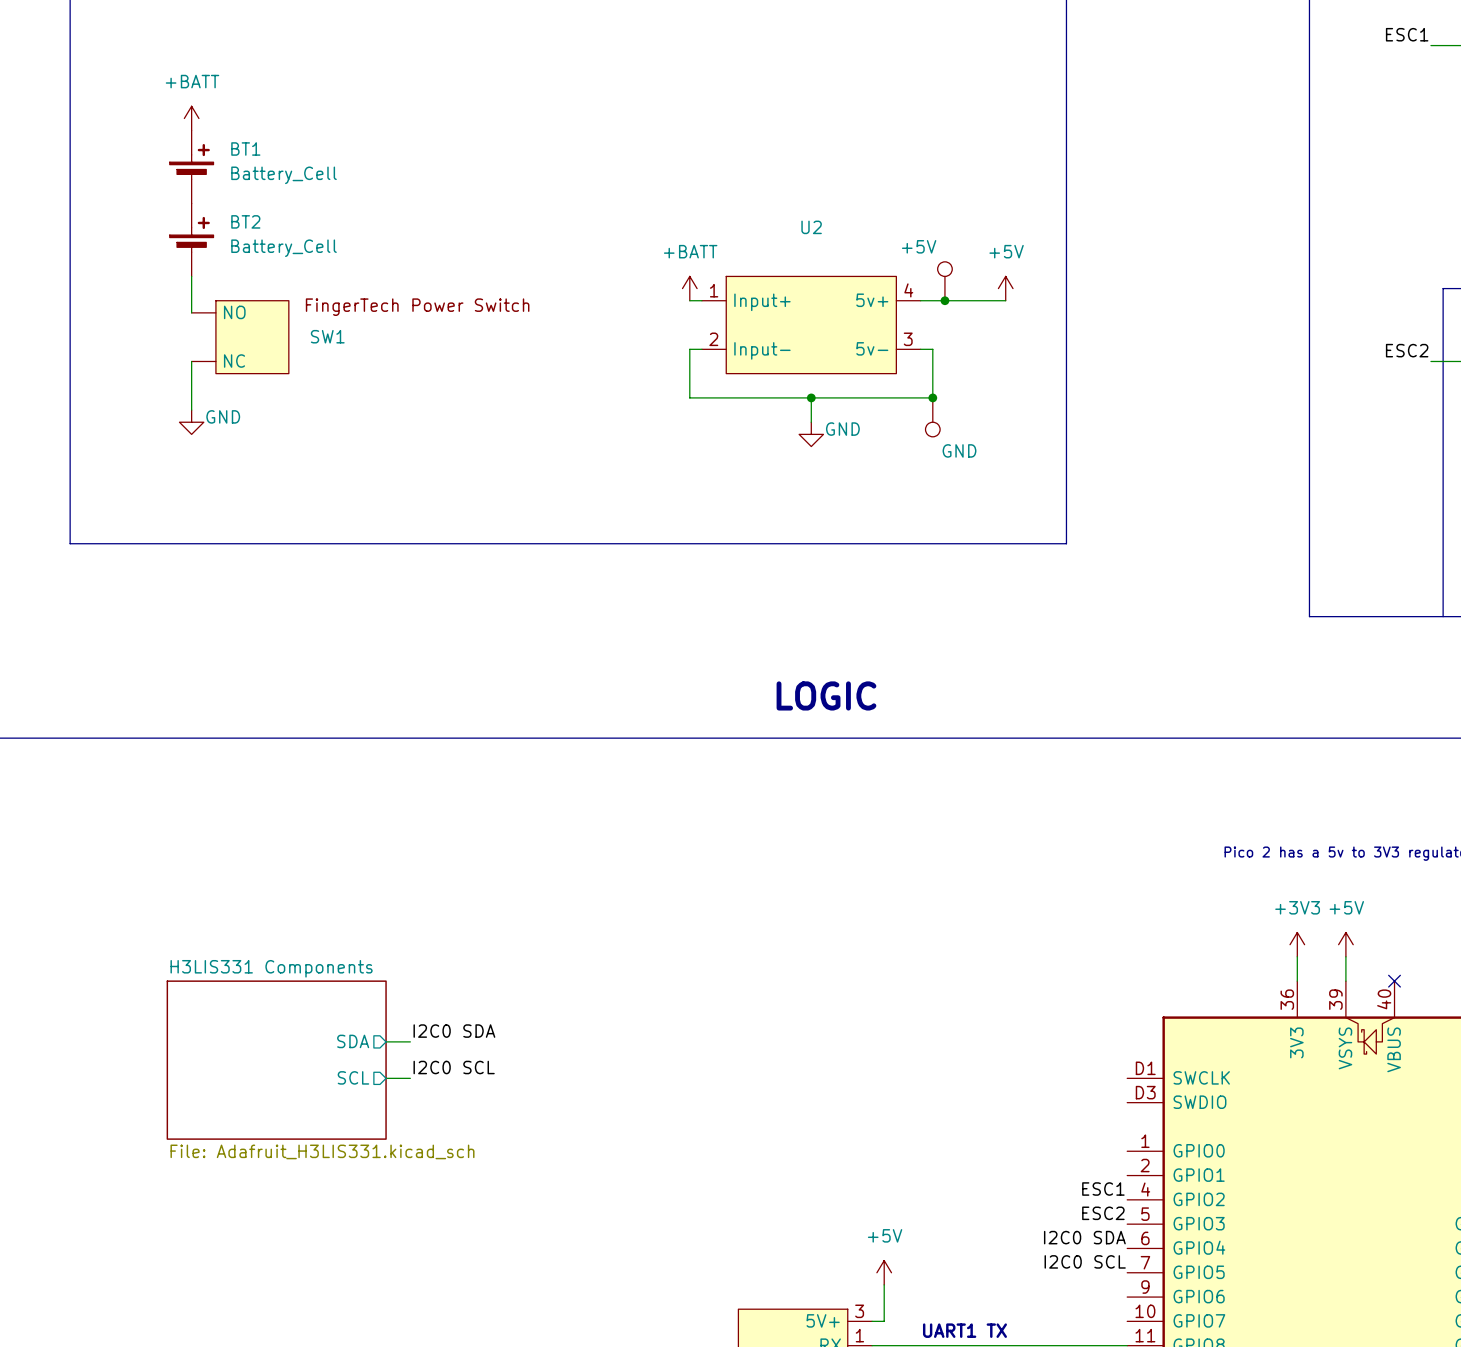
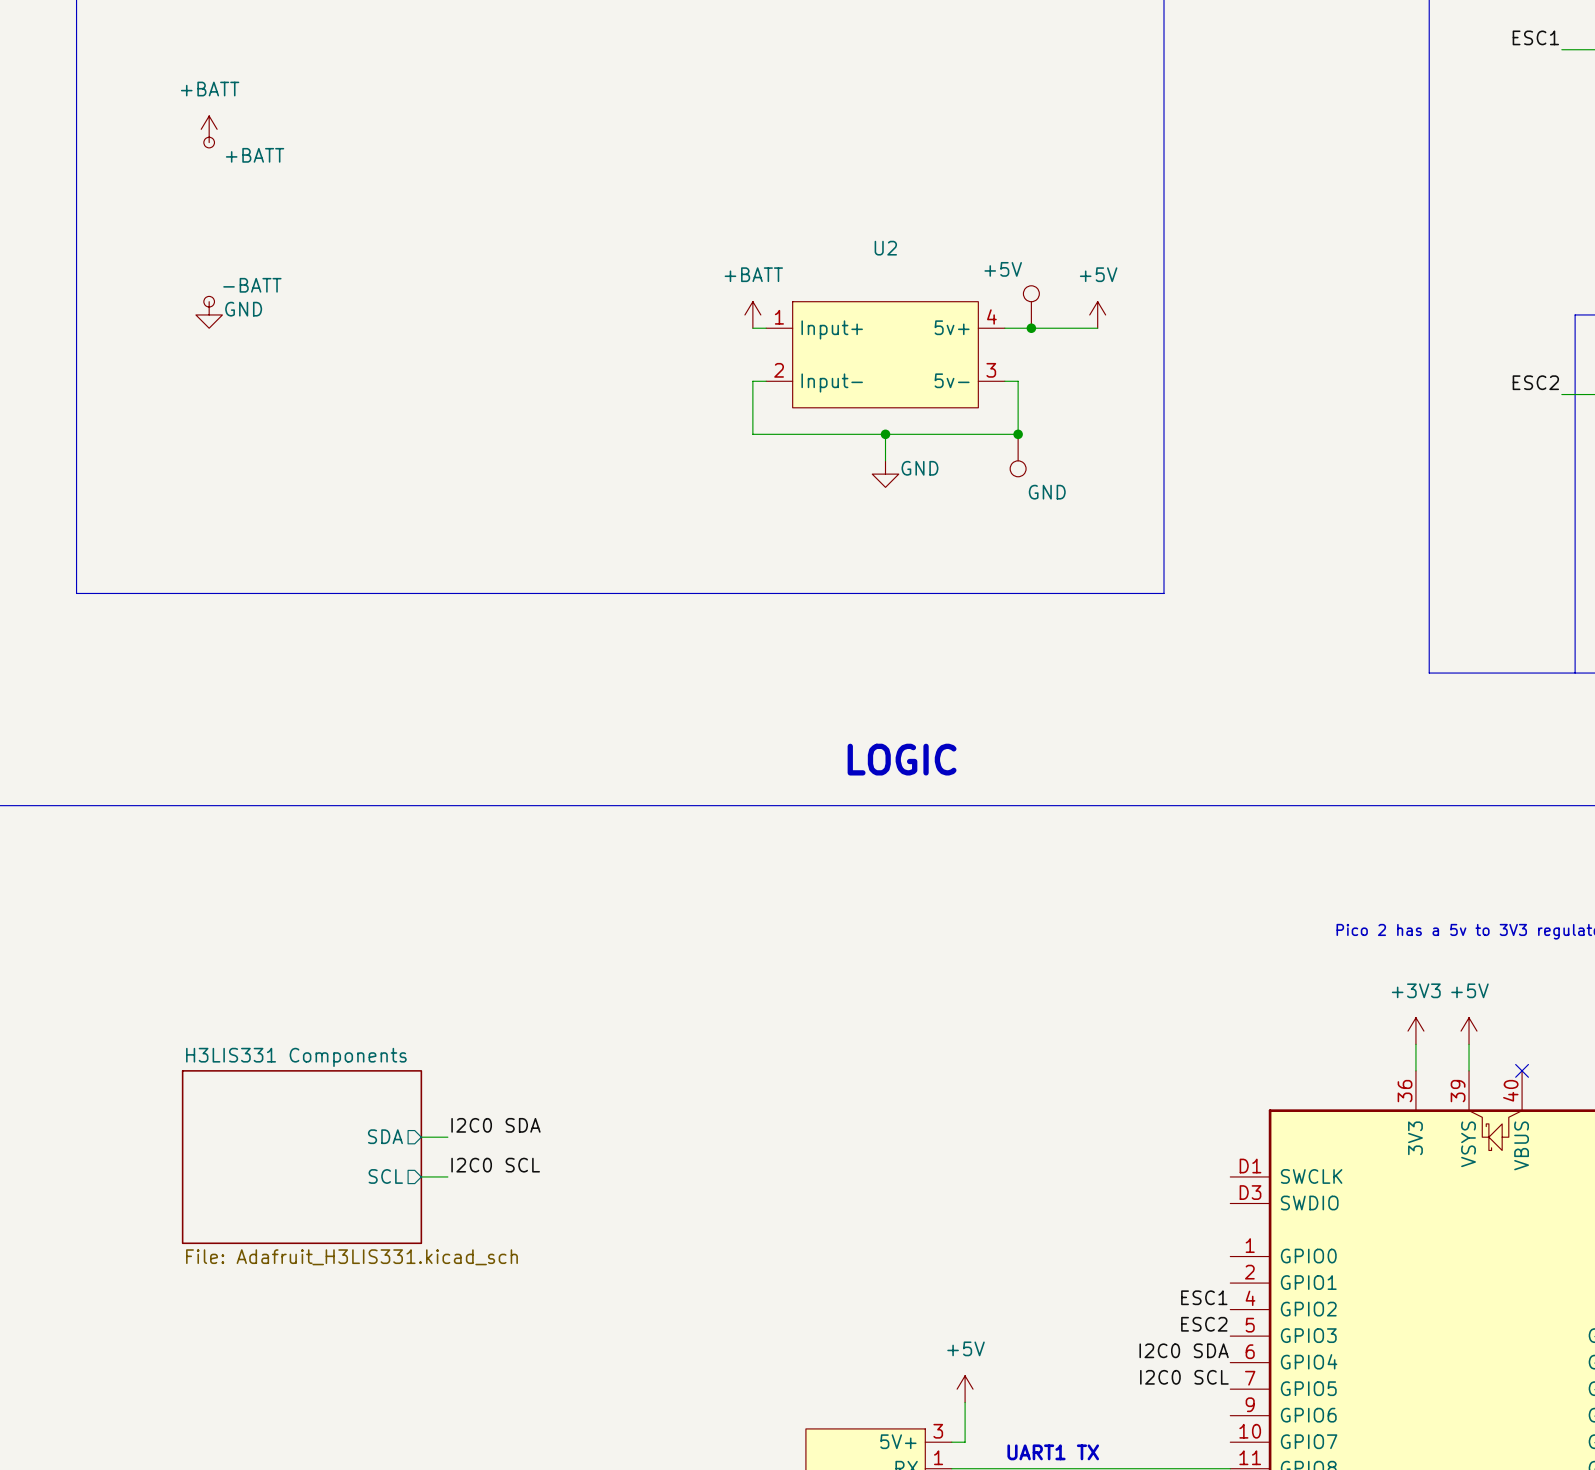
part: none -> +BATT (209, 142)
BT1: Battery_Cell (191, 167) -> none
BT2: Battery_Cell (191, 239) -> none
wire: (191, 276) (191, 312) -> none
part: none -> -BATT (209, 301)
SW1: (240, 337) -> none
wire: (191, 361) (191, 410) -> none
power symbol position: GND (191, 422) -> GND (209, 314)

